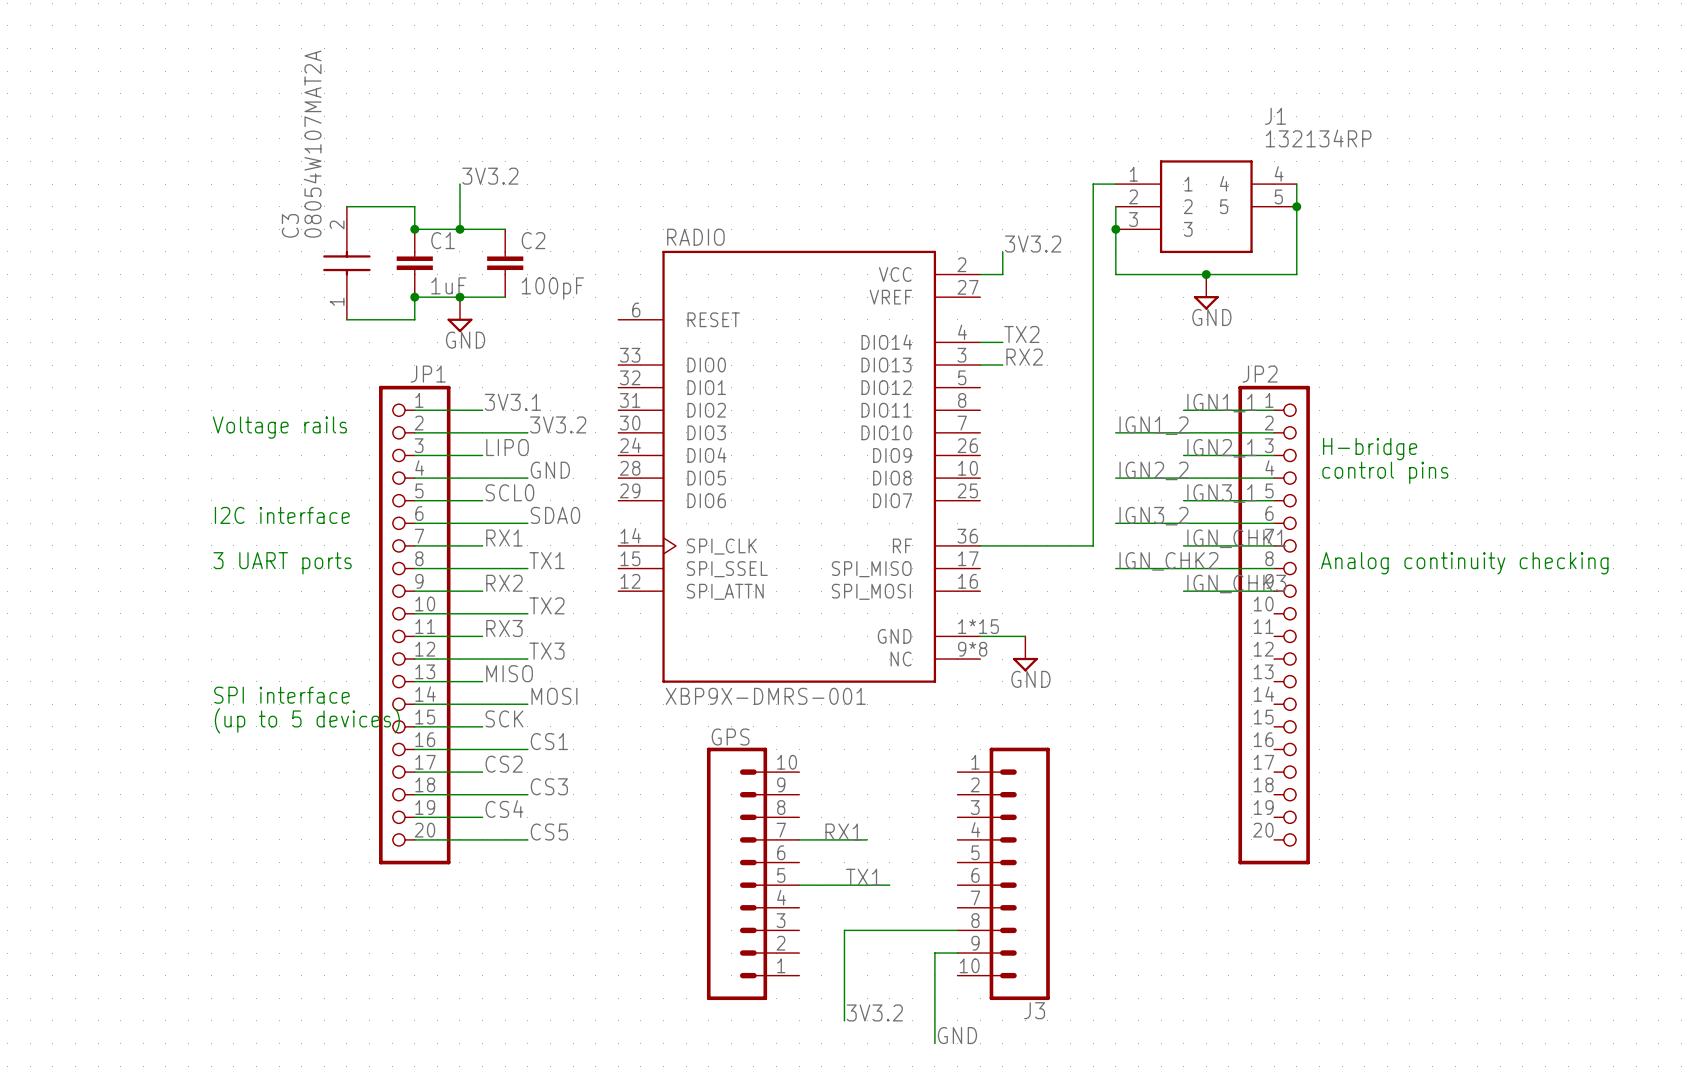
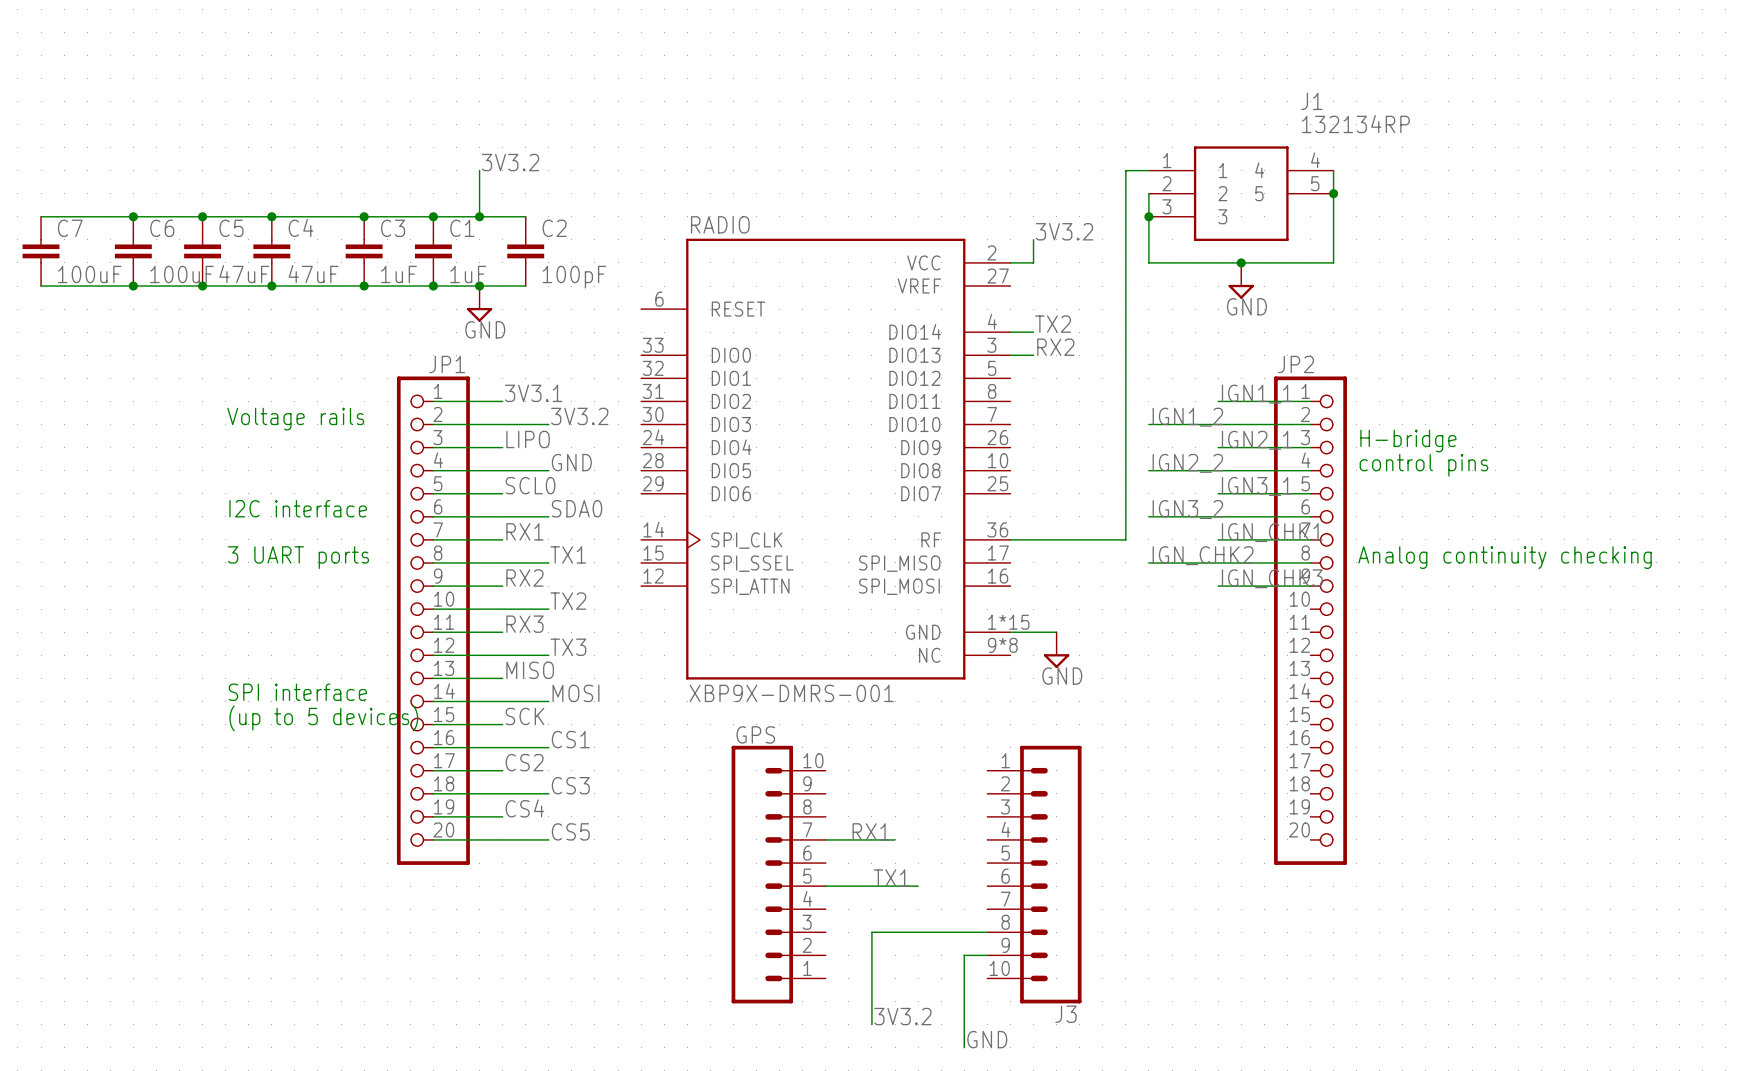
C3 value: 08054W107MAT2A (312, 144) -> 1uF (398, 274)
C3 symbol: [323, 206, 371, 320] -> [345, 216, 383, 287]
wire: (346, 206) (414, 206) (414, 229) -> (41, 216) (433, 216)
C3 name position: C3 (290, 225) -> C3 (393, 228)
junction: none -> (133, 216)
junction: none -> (202, 216)
junction: none -> (271, 216)
junction: none -> (364, 216)
C7: none -> 100uF (41, 251)
C6: none -> 100uF (133, 251)
C5: none -> 47uF (202, 251)
C4: none -> 47uF (271, 251)
junction: none -> (133, 286)
junction: none -> (202, 286)
junction: none -> (271, 286)
junction: none -> (364, 286)
wire: (414, 297) (414, 319) (346, 319) -> (433, 286) (41, 286)

